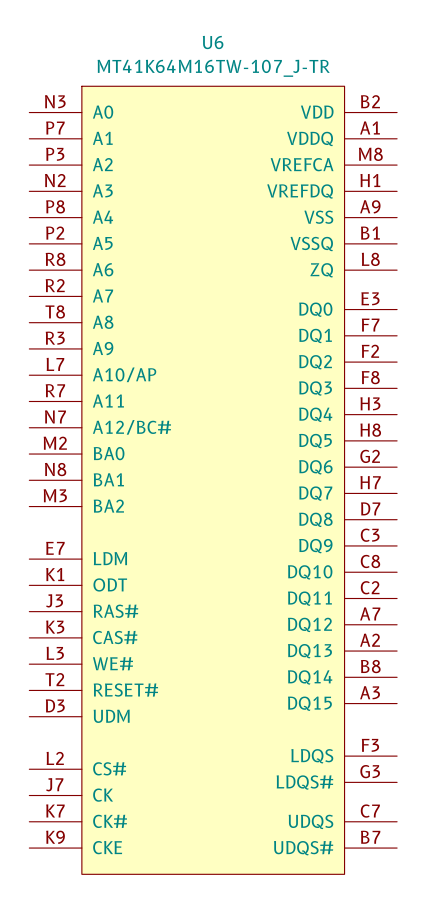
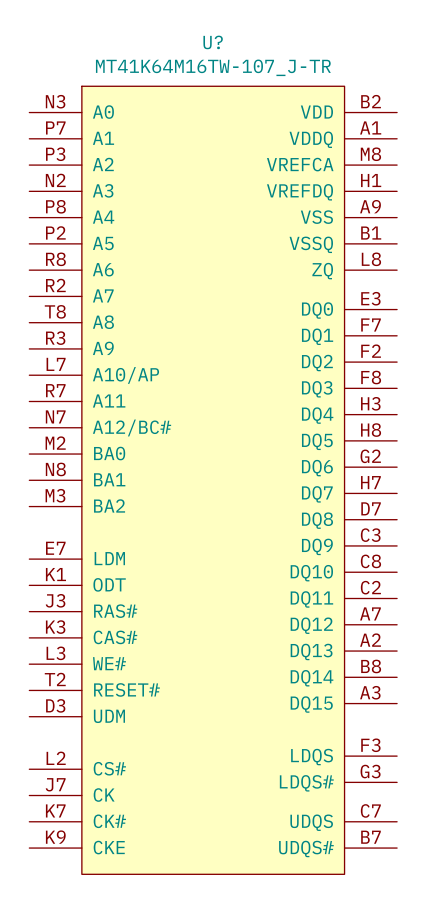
U6 name: U6 (213, 42) -> U? (213, 42)

